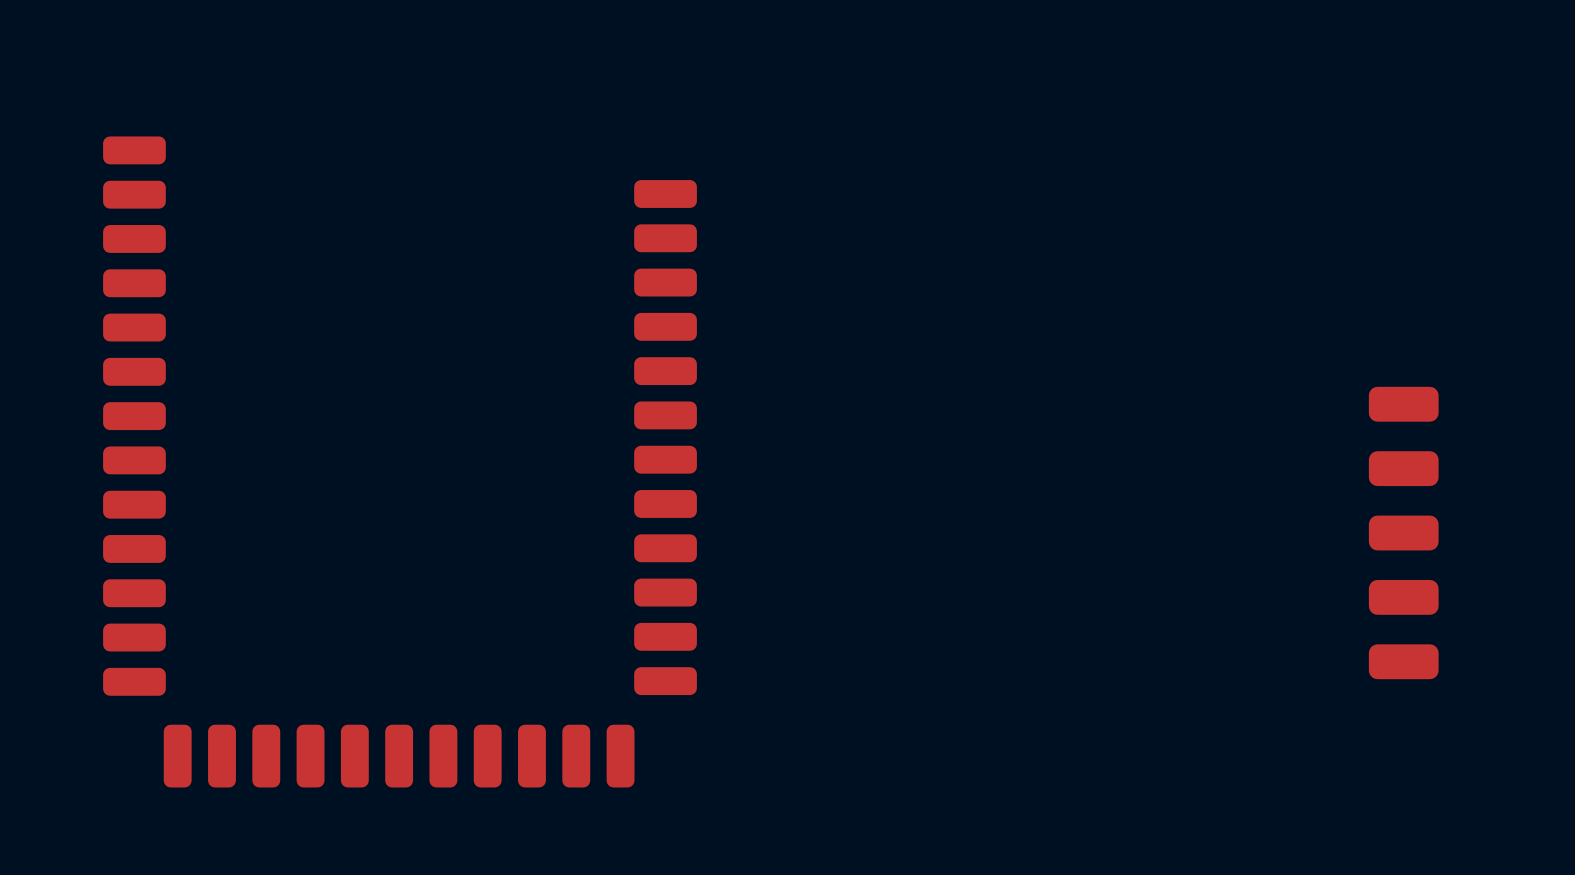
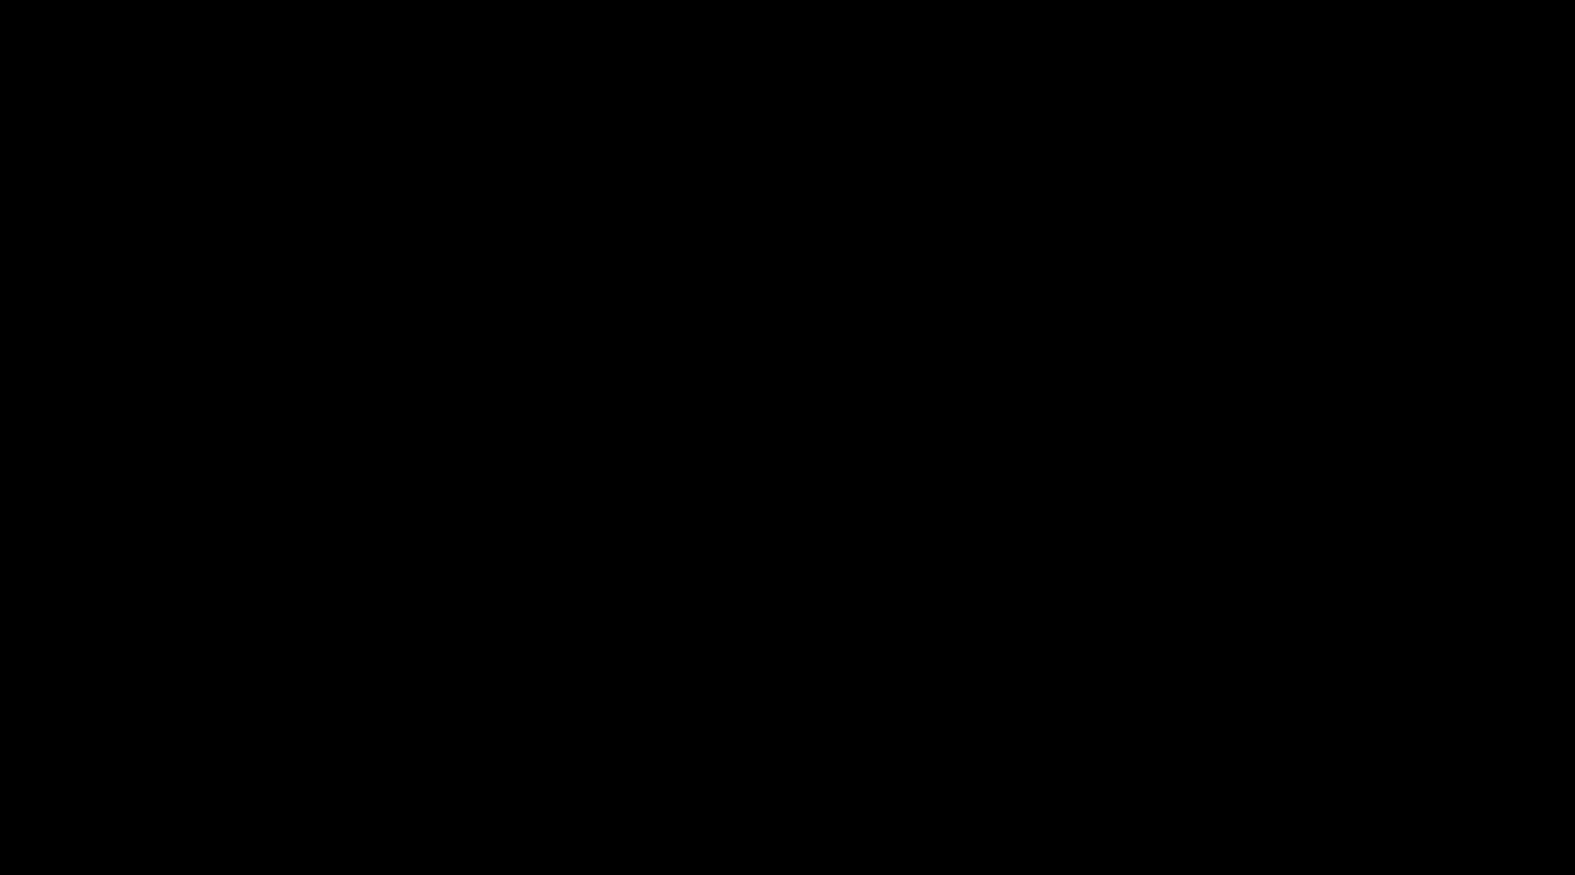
part: (1403, 404) -> none
part: (400, 461) -> none
part: (1403, 468) -> none
part: (1403, 533) -> none
part: (1403, 597) -> none
part: (1403, 661) -> none

